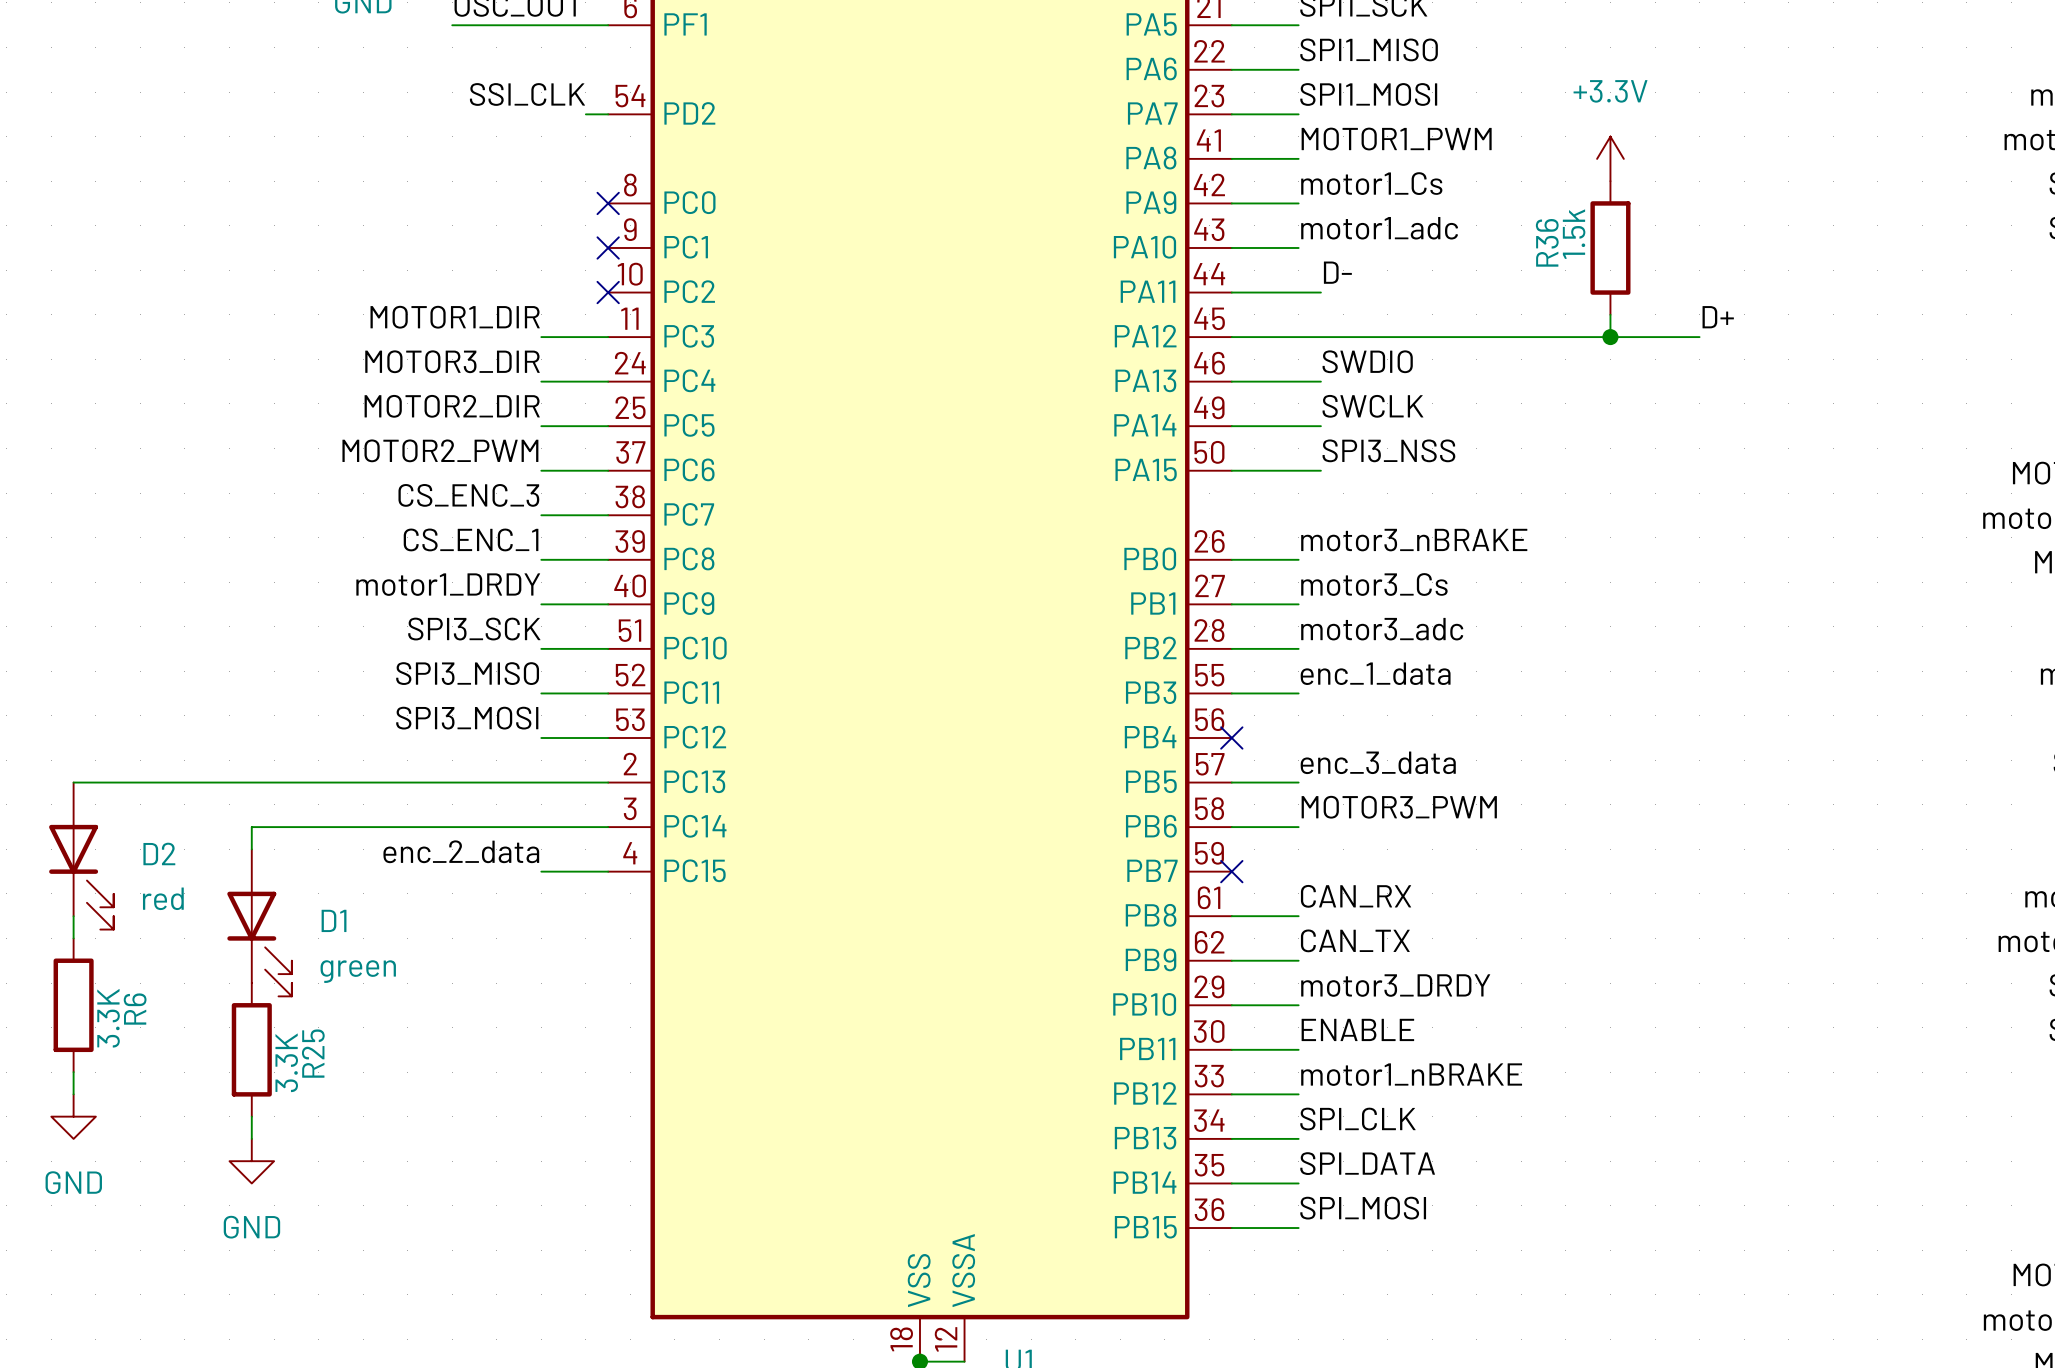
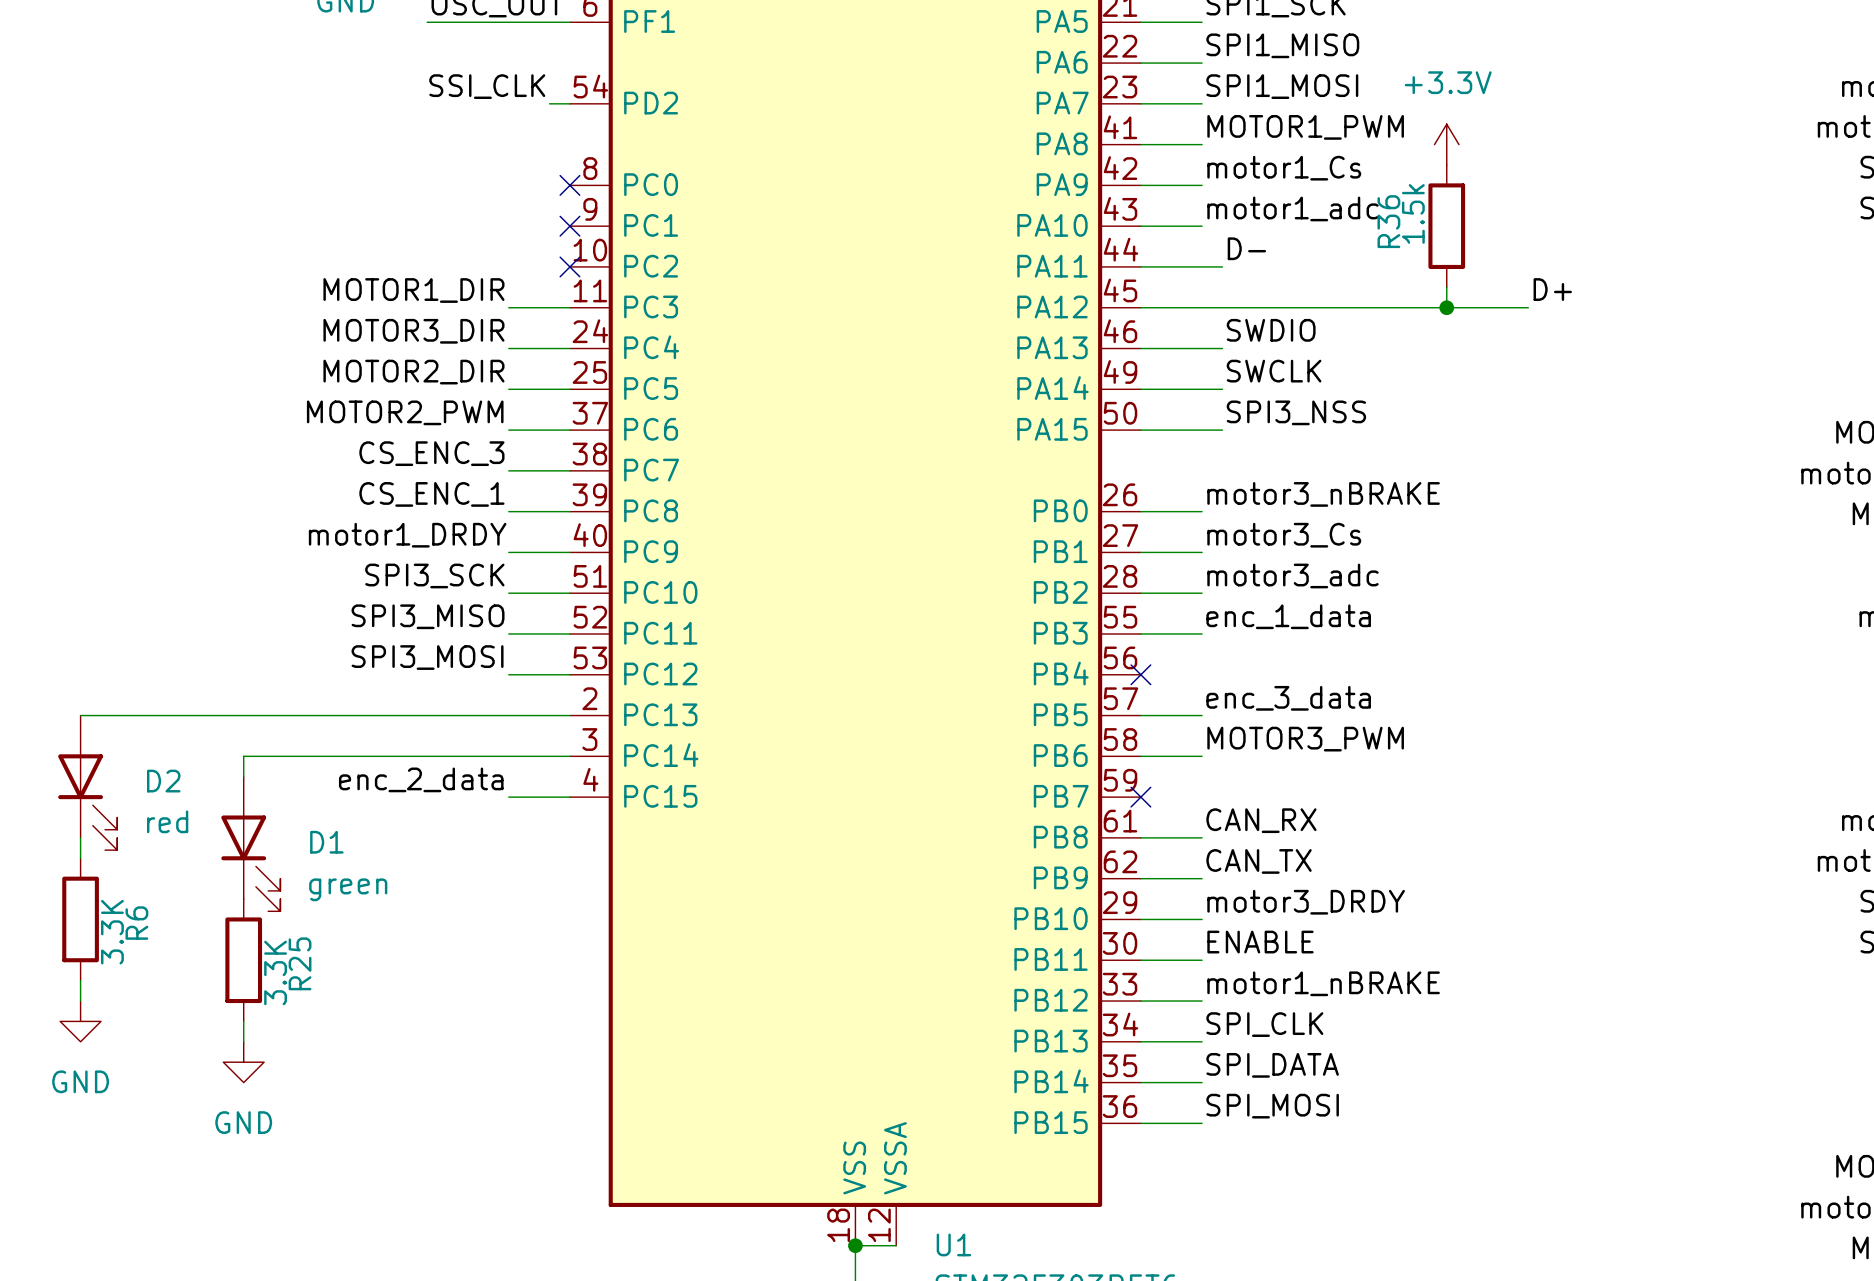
power symbol position: +3.3V (1610, 158) -> +3.3V (1446, 144)
R36 position: (1610, 247) -> (1446, 226)
wire: (1610, 314) (1610, 337) -> (1446, 287) (1446, 307)
label position: D+ (1718, 317) -> D+ (1552, 289)
junction position: (1610, 337) -> (1446, 307)
wire: (1655, 337) (1699, 337) -> none

